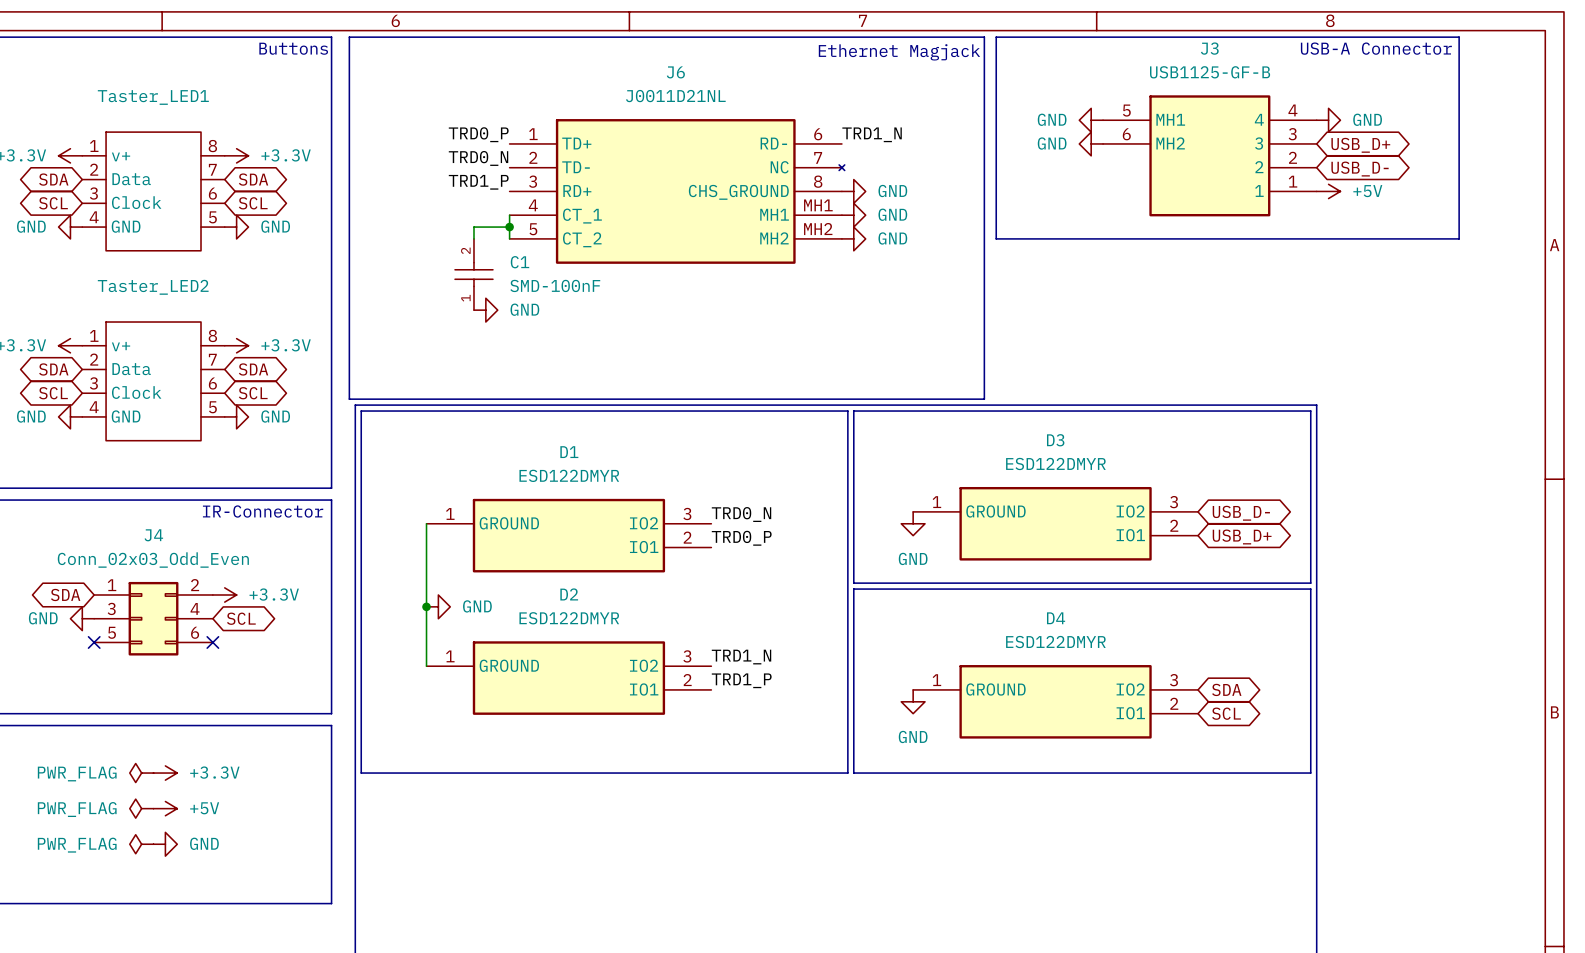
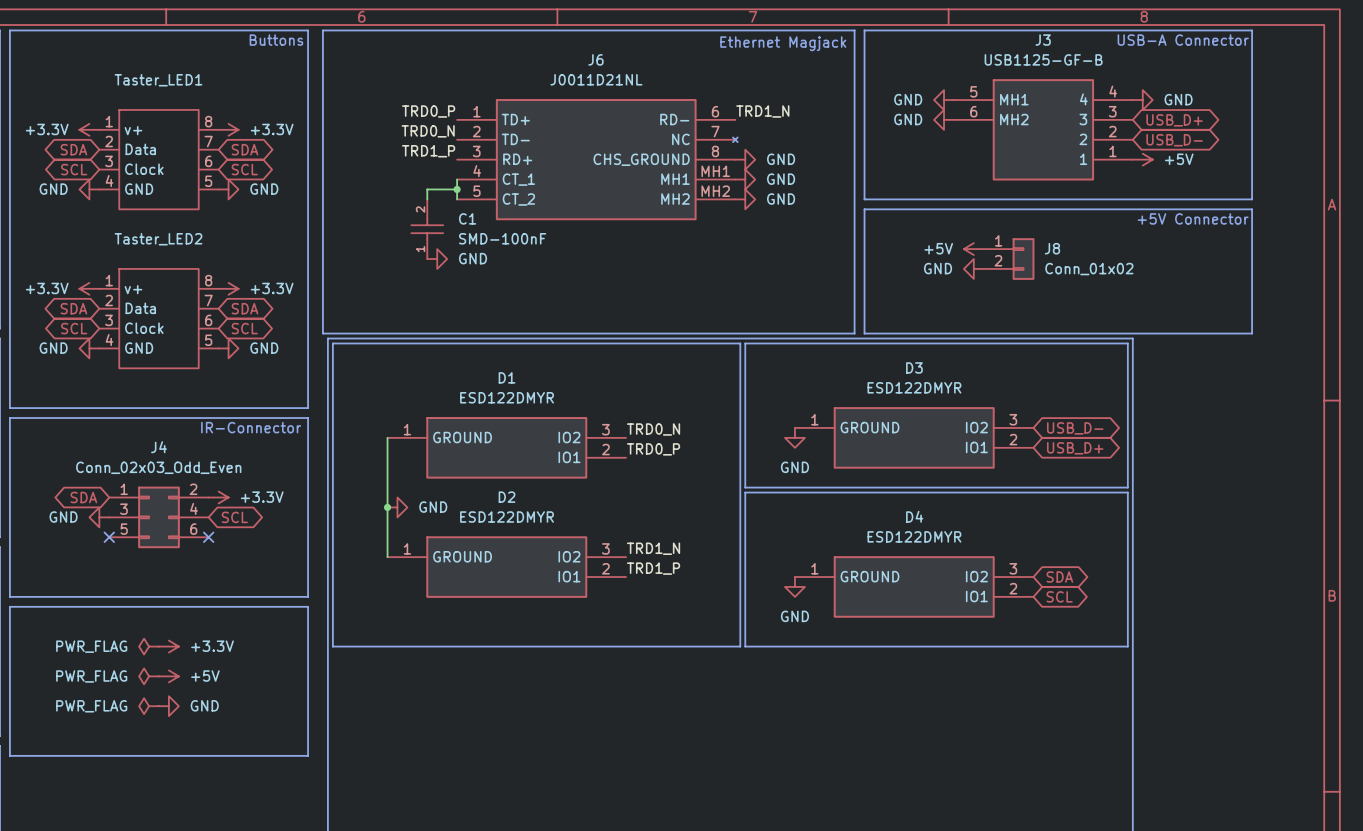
line: none -> (864, 209) (1252, 209) (1252, 333) (864, 333) (864, 209)
text: none -> +5V Connector (1193, 218)
power symbol: none -> +5V (973, 249)
J8: none -> Conn_01x02 (1009, 259)
power symbol: none -> GND (973, 268)

